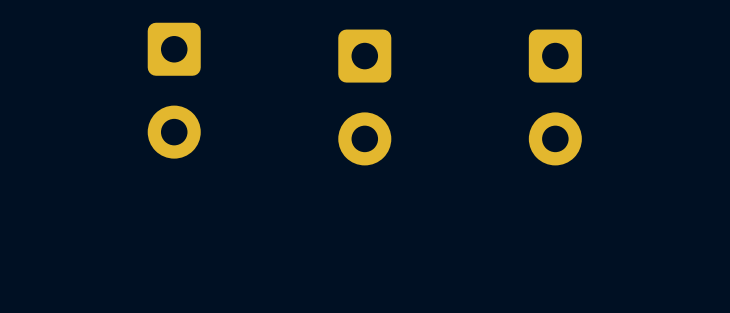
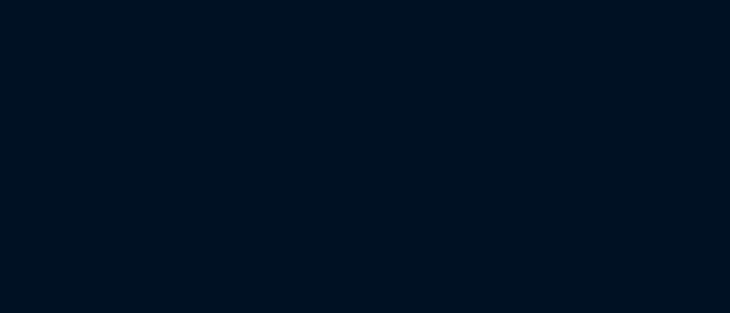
part: (174, 90) -> none
part: (364, 97) -> none
part: (555, 97) -> none

